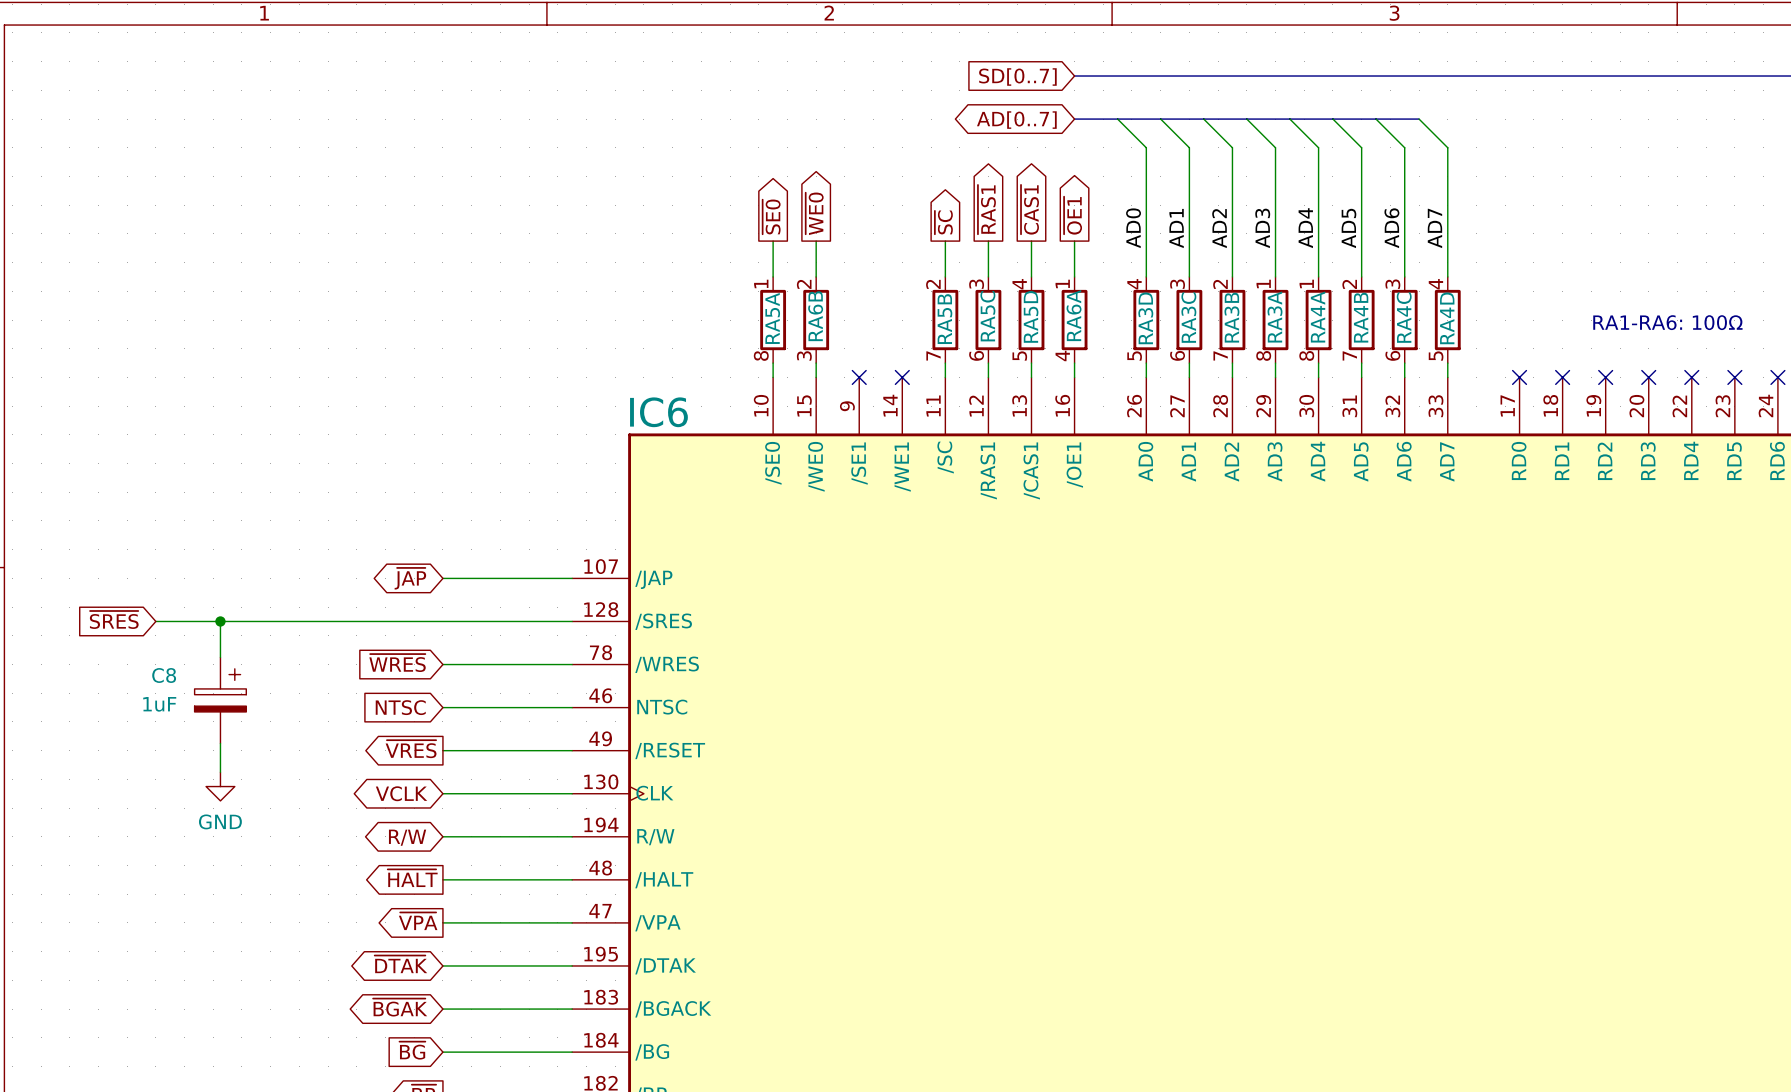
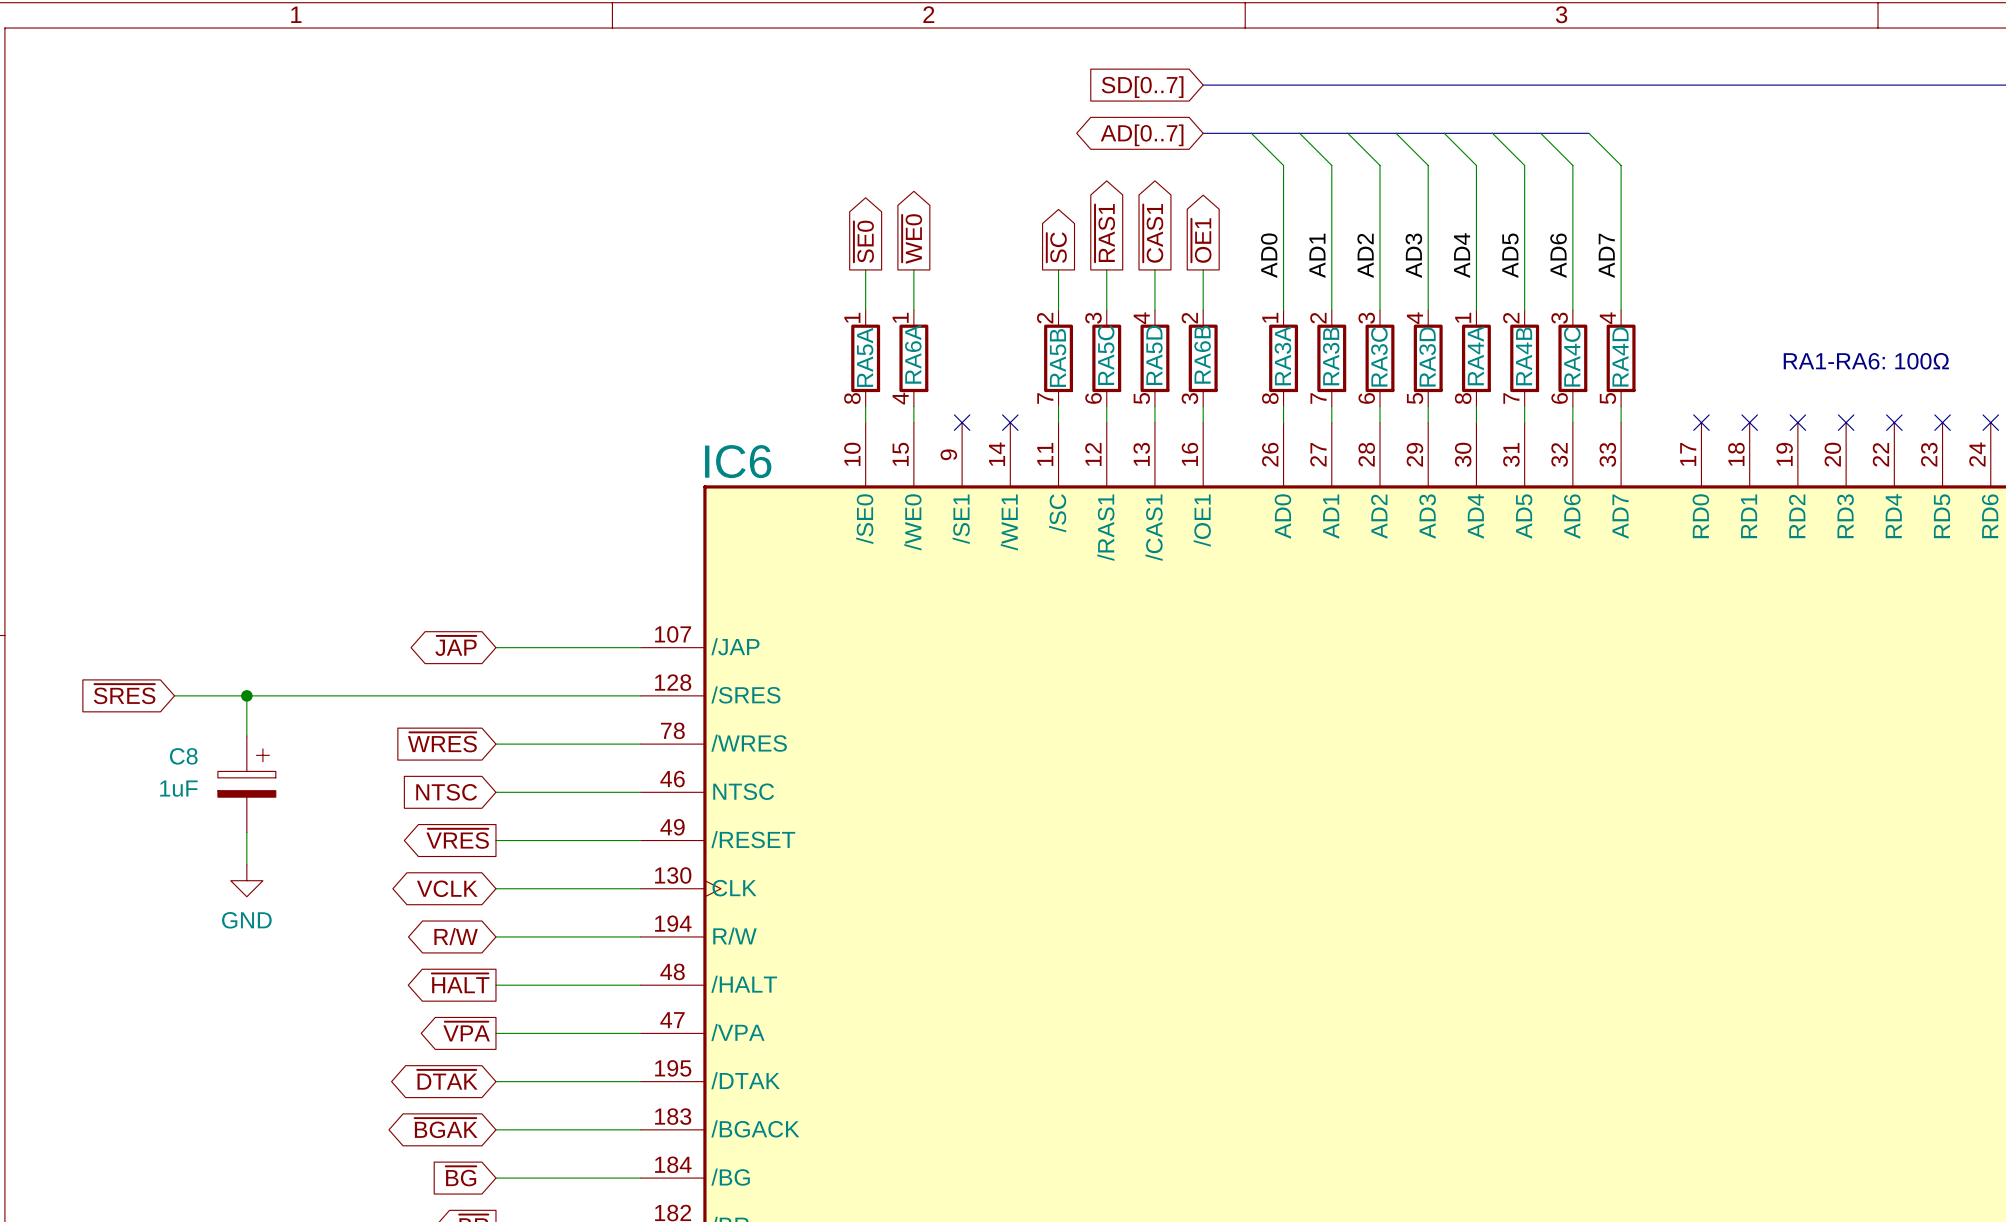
RA6B position: (816, 320) -> (1203, 358)
RA6A position: (1074, 320) -> (913, 358)
RA3D position: (1146, 320) -> (1428, 358)
RA3C position: (1189, 320) -> (1379, 358)
RA3B position: (1232, 320) -> (1331, 358)
RA3A position: (1275, 320) -> (1283, 358)

